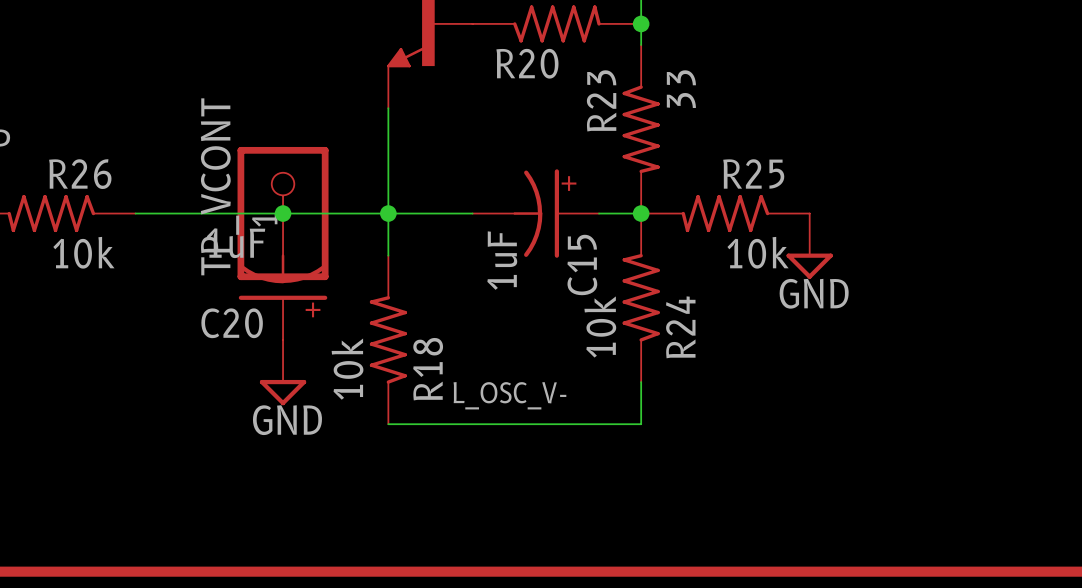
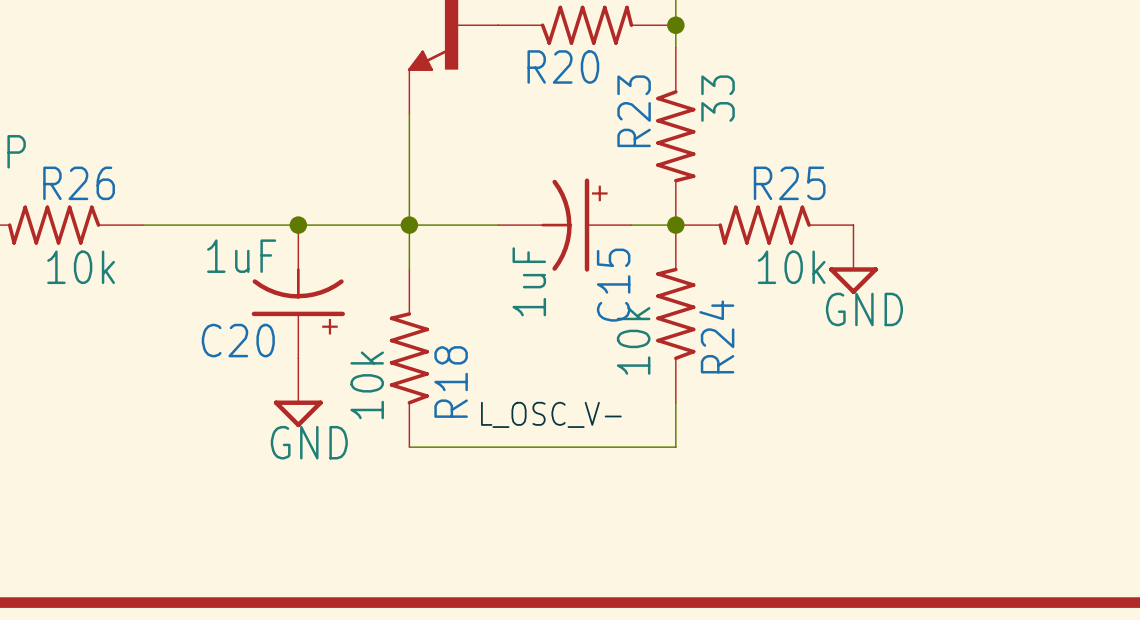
TP_VCONT: (283, 213) -> none

